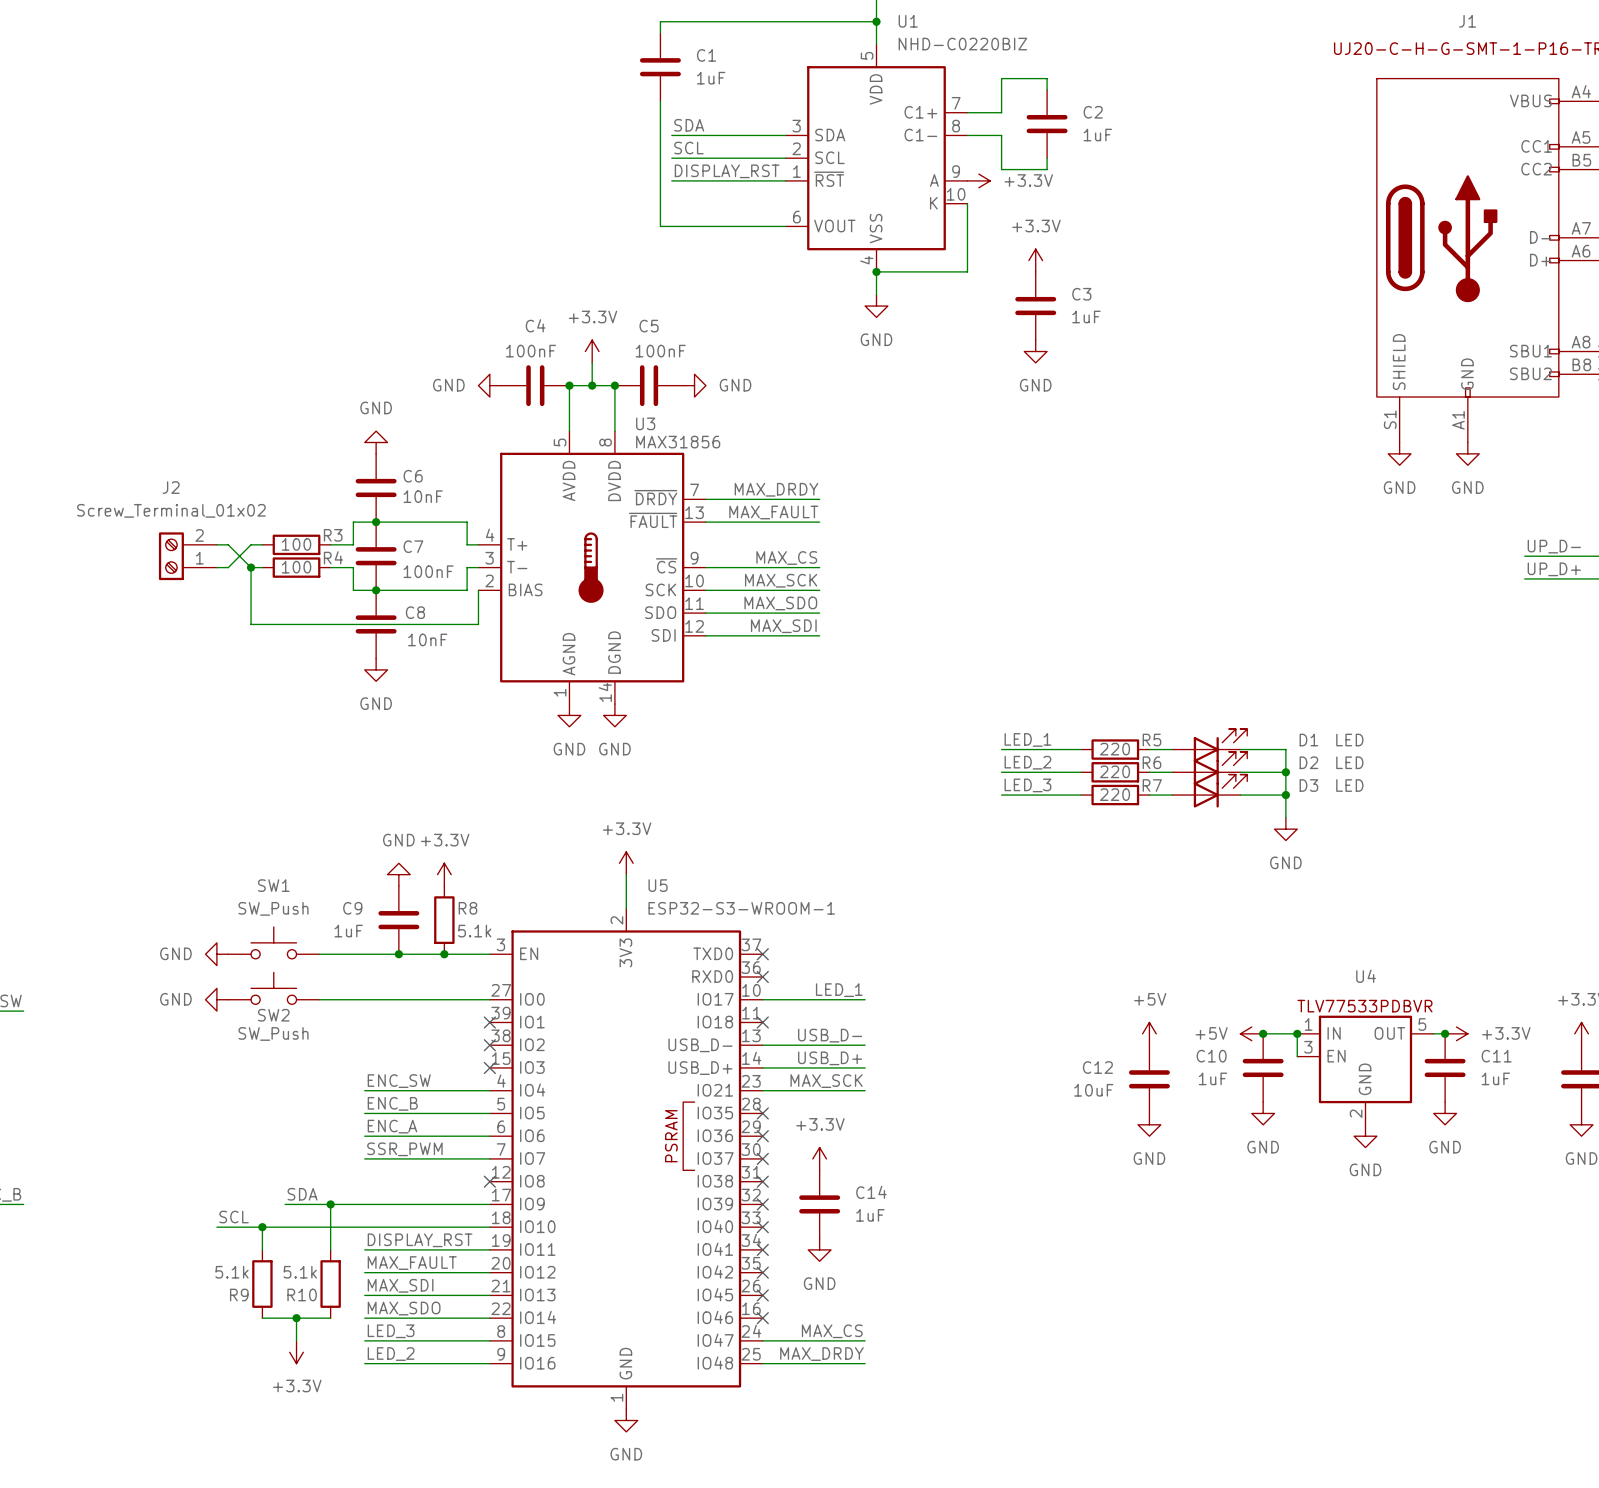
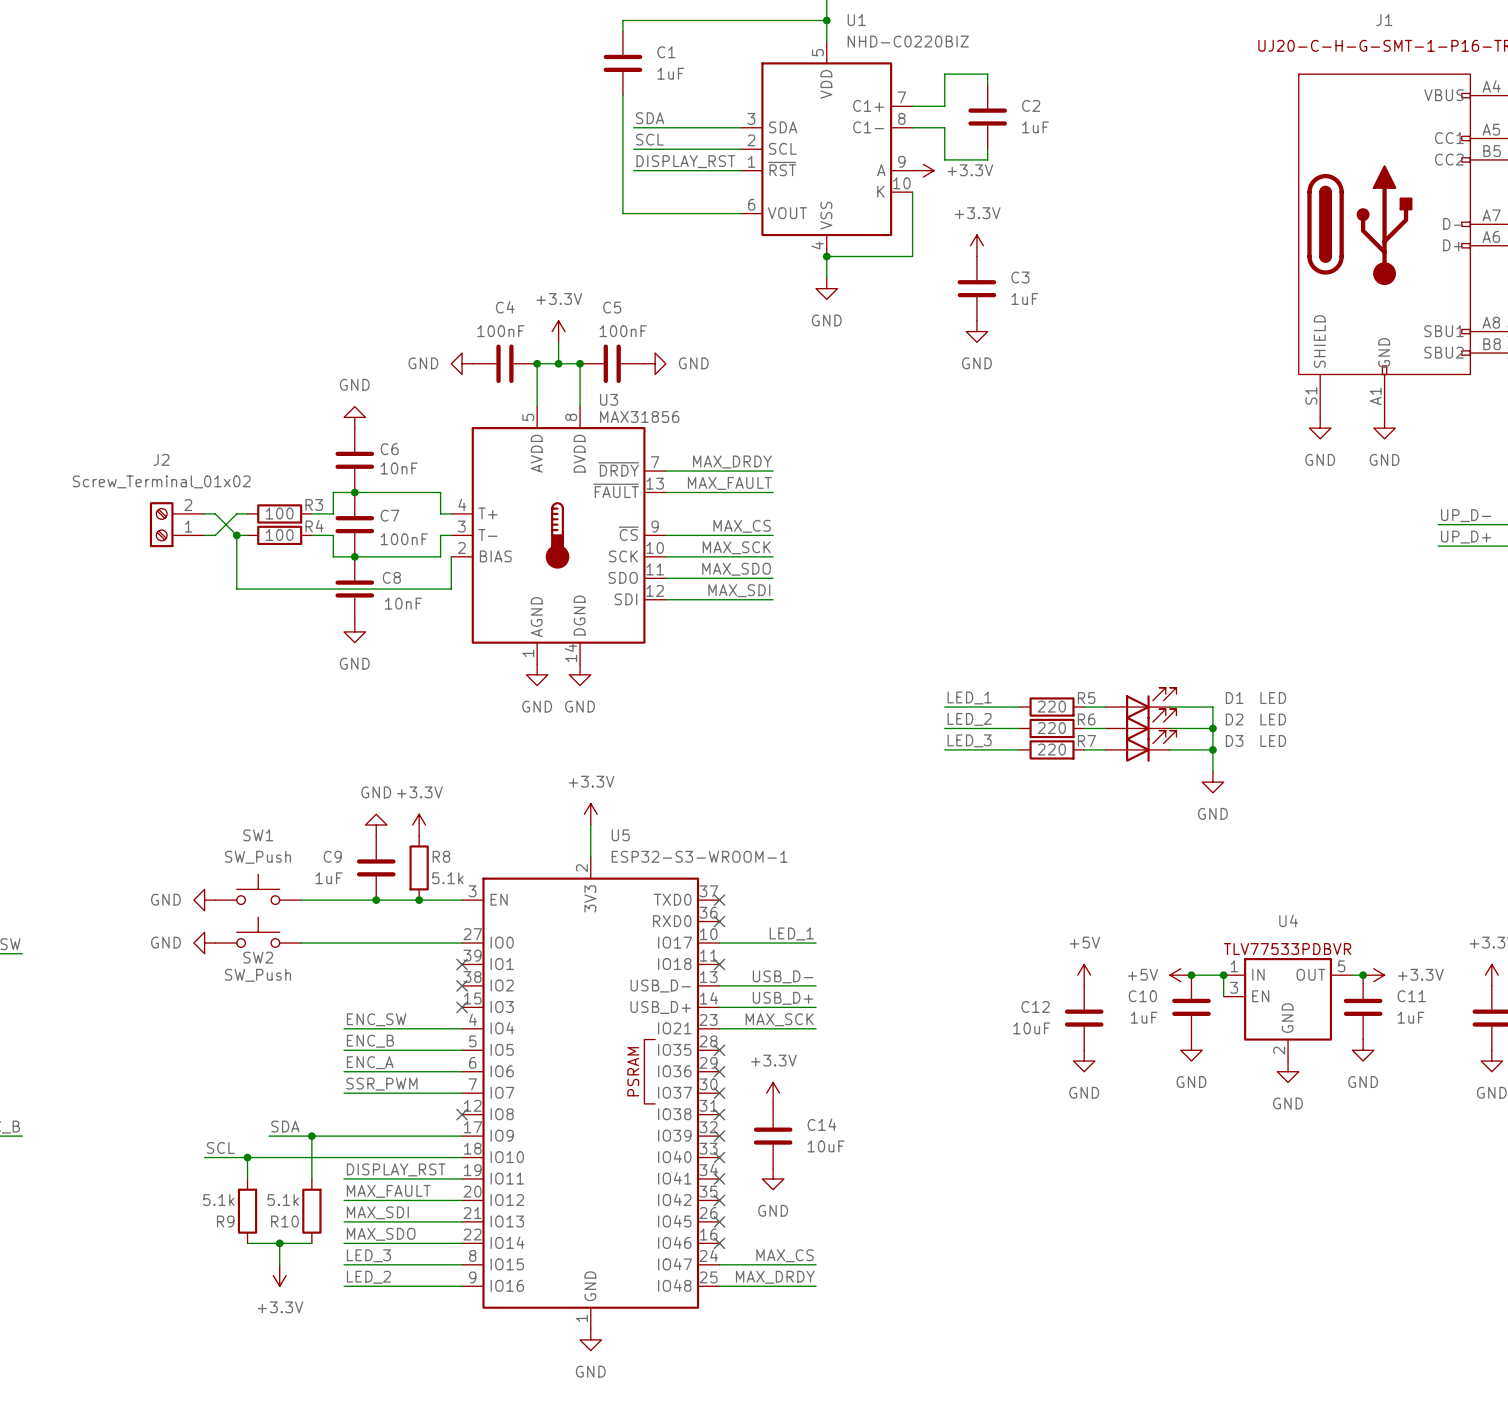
C14 value: 1uF (870, 1215) -> 10uF (826, 1146)

